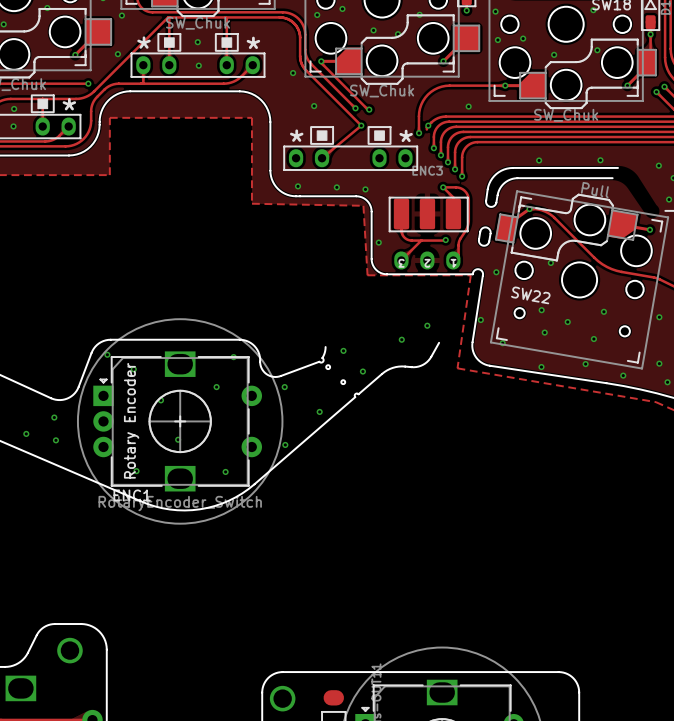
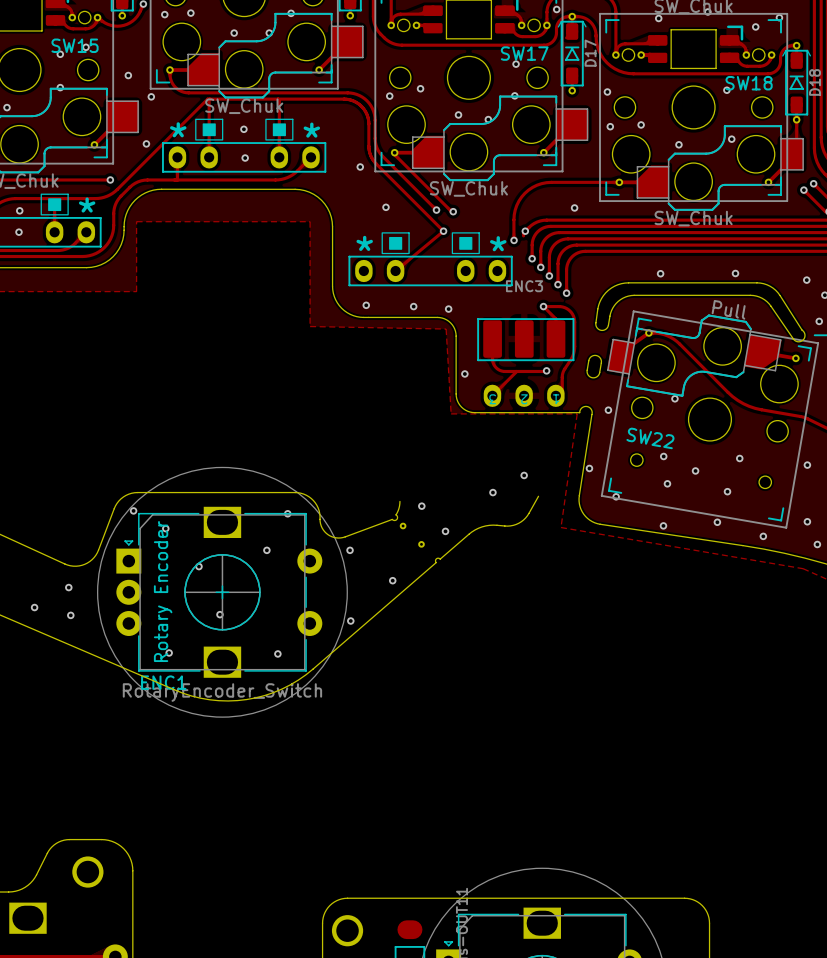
board edge: none -> (756, 282) (766, 284) (778, 292) (804, 332) (803, 339) (798, 341) (794, 340) (769, 303) (762, 298) (750, 295)

